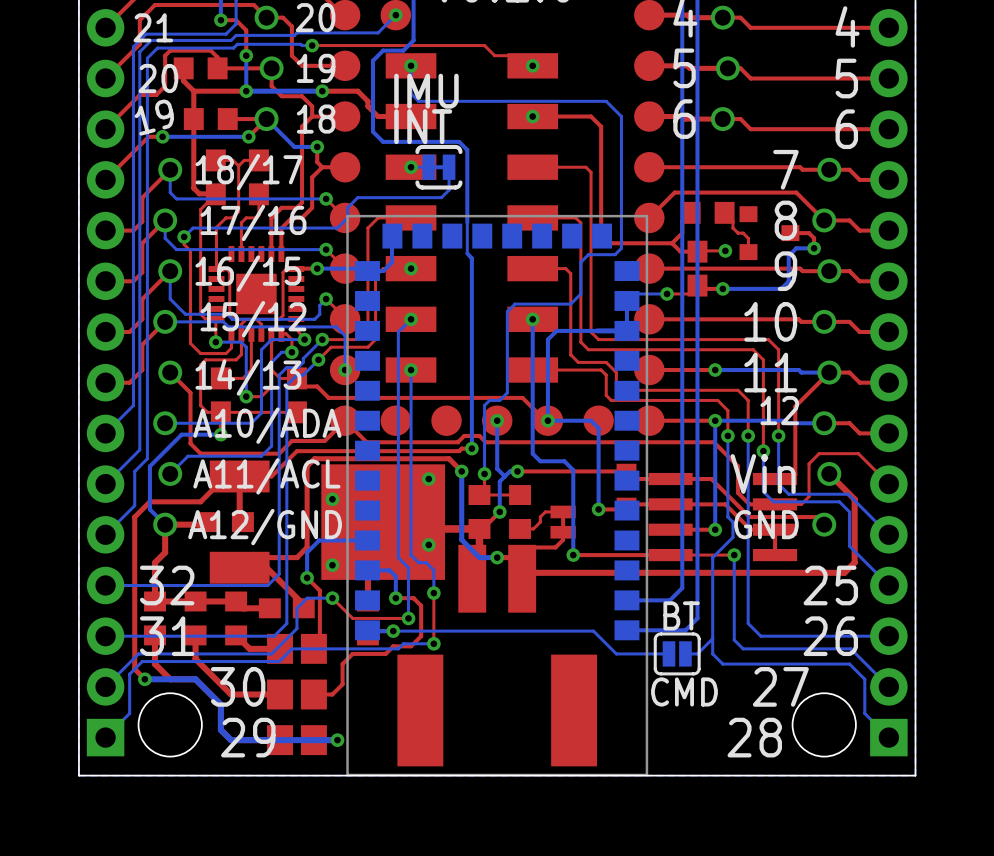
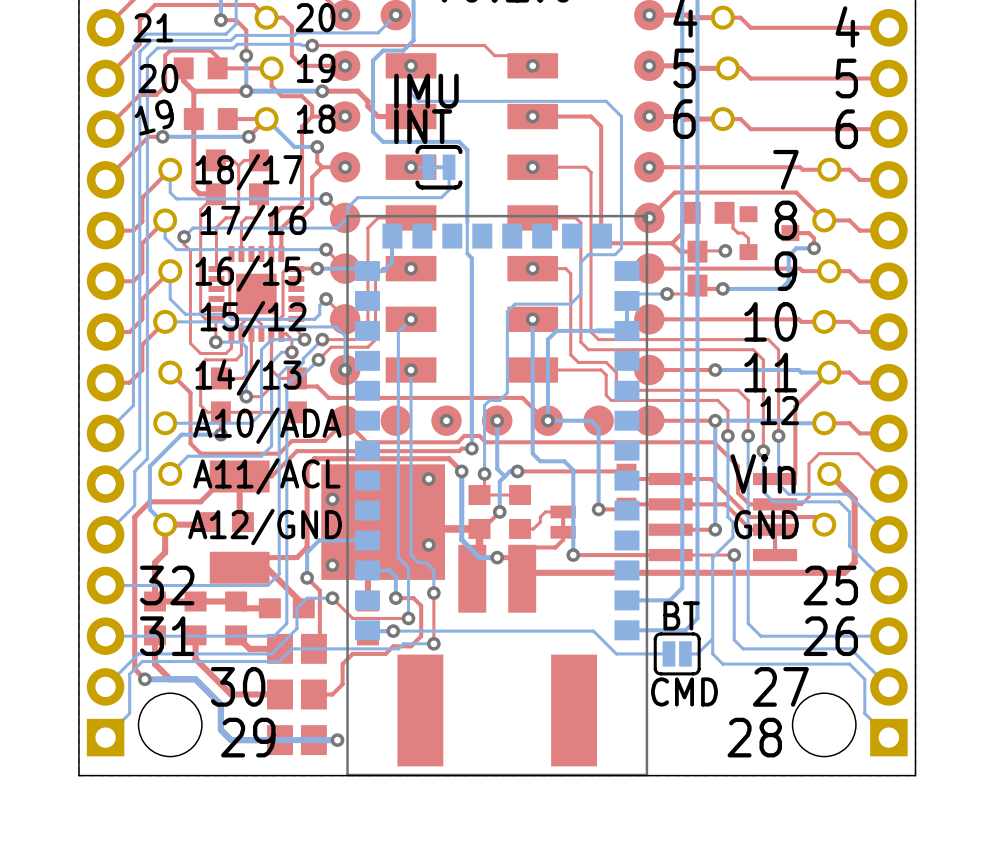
via: none -> (345, 15)
via: none -> (649, 15)
via: none -> (345, 65)
via: none -> (649, 65)
via: none -> (345, 116)
via: none -> (649, 116)
via: none -> (345, 167)
via: none -> (532, 167)
via: none -> (649, 167)
via: none -> (649, 217)
via: none -> (532, 268)
via: none -> (446, 420)

